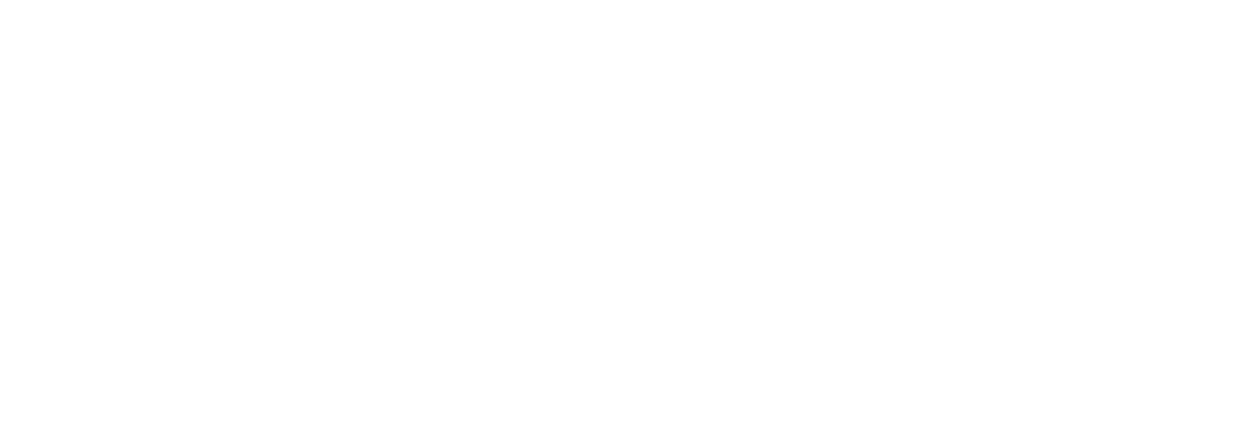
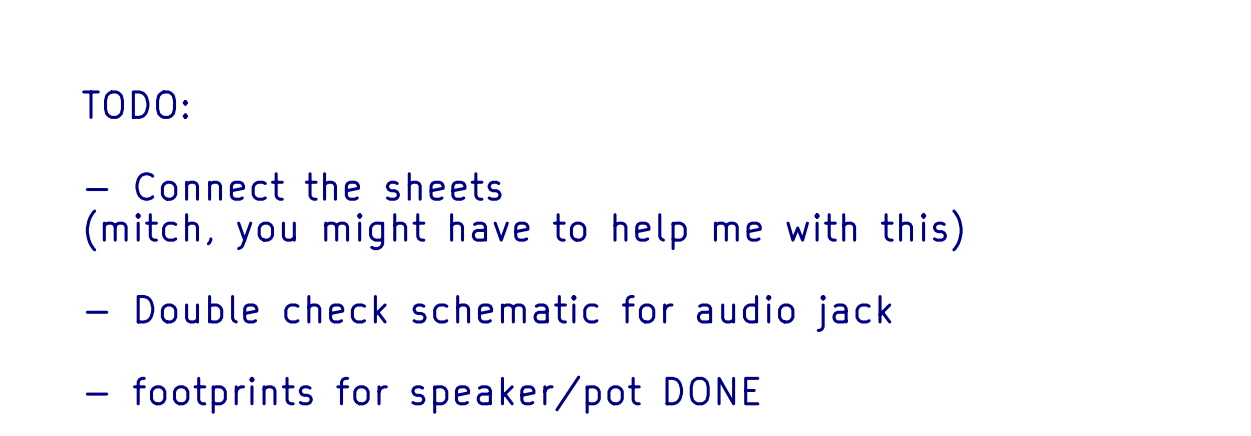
text: none -> TODO: (135, 104)
text: none -> - Connect the sheets (293, 186)
text: none -> (mitch, you might have to help me with this) (524, 230)
text: none -> - Double check schematic for audio jack (488, 313)
text: none -> - footprints for speaker/pot DONE (422, 394)

